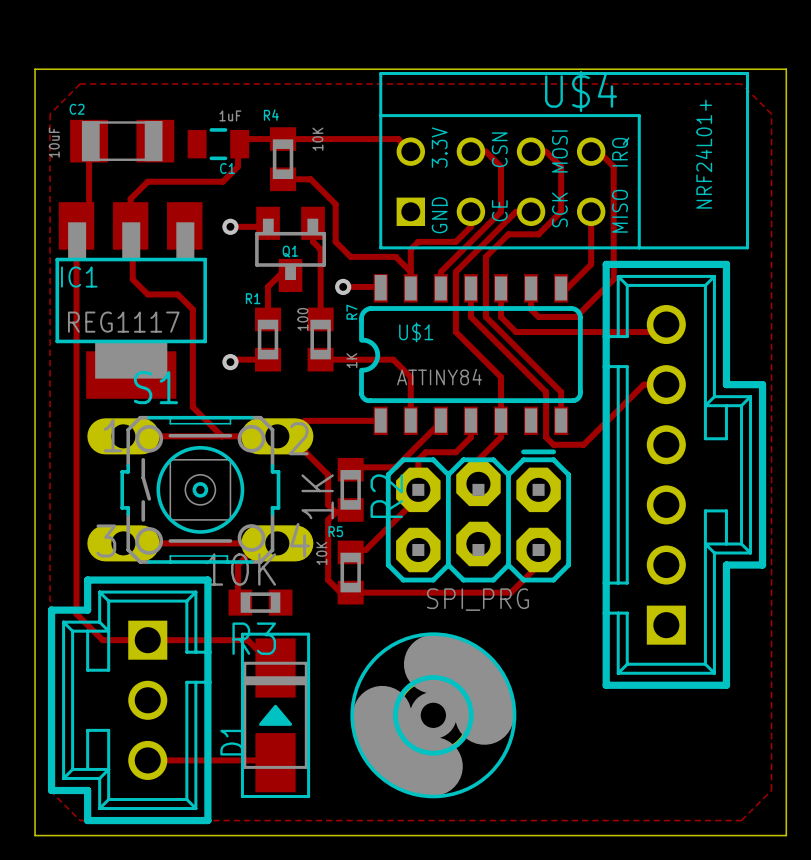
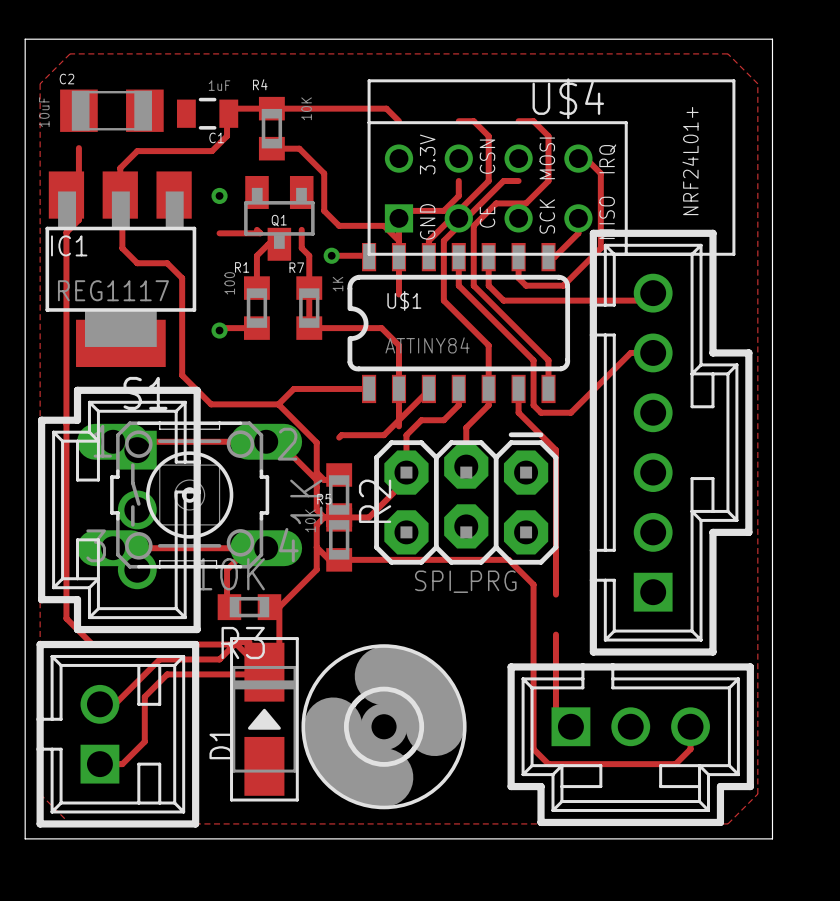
board edge: (35, 69) (786, 69) -> (25, 76) (25, 39) (772, 39) (772, 76)
zone outline: (50, 114) (80, 84) (741, 84) (771, 114) -> (40, 121) (40, 83) (70, 53) (727, 53) (757, 83) (757, 121)
C2 position: (122, 141) -> (111, 110)
C1 position: (218, 144) -> (207, 113)
track: (410, 151) (398, 139) (244, 139) (237, 145) (237, 166) (222, 181) (147, 181) (130, 198) (130, 225) (132, 228) -> (398, 121) (386, 108) (233, 108) (227, 115) (227, 136) (212, 151) (137, 151) (120, 168) (122, 234)
track: (470, 151) (485, 151) (501, 166) (501, 211) (440, 271) (440, 288) -> (458, 121) (473, 121) (488, 136) (488, 181) (428, 240) (428, 257)
track: (531, 151) (546, 151) (561, 166) -> (518, 121) (533, 121) (548, 136) (548, 173)
R4 position: (283, 159) -> (271, 128)
track: (561, 174) (561, 211) (538, 234) (508, 234) (485, 256) -> (548, 181) (526, 203) (496, 203) (473, 225) (473, 263)
track: (283, 179) (310, 179) (335, 204) (335, 241) (350, 256) (395, 256) (410, 271) -> (271, 148) (299, 148) (324, 173) (324, 210) (339, 225) (384, 225) (398, 240)
track: (470, 211) (470, 226) (455, 241) (418, 241) (410, 249) -> (458, 181) (458, 195) (443, 210) (406, 210) (398, 218) (398, 255)
track: (531, 211) (516, 211) (455, 271) -> (518, 181) (503, 181) (443, 240) (443, 278)
via position: (230, 226) -> (219, 195)
track: (591, 226) (591, 264) -> (600, 248) (578, 270)
track: none -> (578, 233) (554, 257) (548, 257)
track: (132, 241) (132, 279) (147, 294) (177, 294) (192, 309) -> (122, 248) (137, 263) (167, 263) (182, 278) (182, 315)
track: (613, 241) (613, 279) (576, 317) (538, 317) (531, 309) (531, 288) -> none
Q1 position: (290, 249) -> (279, 218)
track: (290, 275) (279, 275) (268, 286) (268, 319) -> (279, 244) (268, 244) (256, 255) (256, 288)
track: (485, 279) (485, 317) (561, 392) (561, 420) -> (473, 285) (548, 360) (548, 388)
track: (576, 279) (567, 288) (561, 288) -> (563, 285) (526, 285) (518, 278) (518, 257)
track: (343, 286) (380, 288) -> (331, 255) (369, 257)
via position: (343, 286) -> (331, 255)
track: (470, 288) (470, 317) (546, 392) -> (458, 257) (458, 285) (533, 360) (533, 397)
track: (501, 288) (501, 317) (516, 332) (658, 332) (666, 324) -> (488, 257) (488, 285) (503, 300) (645, 300) (653, 293)
track: (455, 294) (455, 332) (501, 377) -> (443, 300) (488, 345) (488, 382)
IC1 position: (131, 300) -> (120, 269)
R7 name rotation: 0° (351, 312) -> 90° clockwise (296, 267)
R7 name position: R7 (351, 312) -> R7 (296, 267)
R1 value position: 100 (302, 319) -> 100 (229, 283)
R1 position: (268, 339) -> (256, 308)
R7 position: (320, 339) -> (309, 308)
U$1 position: (470, 354) -> (458, 323)
track: (268, 359) (232, 359) (230, 362) -> (256, 328) (221, 328) (219, 330)
track: (320, 359) (393, 359) (410, 377) -> (309, 328) (381, 328) (398, 345) (398, 382)
R7 value position: 1K (351, 360) -> 1K (337, 284)
via position: (230, 362) -> (219, 330)
track: (192, 369) (192, 407) (222, 436) -> (182, 375) (211, 404) (278, 404)
track: none -> (518, 388) (518, 412) (555, 450) (555, 594)
track: (666, 384) (643, 384) (583, 444) (553, 444) (546, 437) (546, 399) -> (653, 352) (630, 352) (570, 412) (541, 412) (533, 405)
track: none -> (278, 404) (316, 442) (316, 472) (324, 480) (336, 480) (339, 477)
track: (501, 399) (501, 437) (478, 459) -> (488, 405) (466, 427) (466, 465)
track: (380, 420) (305, 420) (289, 436) -> (369, 388) (293, 388) (278, 404)
track: (440, 420) (395, 467) (353, 467) (350, 469) -> (428, 388) (384, 435) (341, 435) (339, 437)
track: (470, 420) (470, 437) (455, 452) (425, 452) (418, 459) -> (458, 388) (458, 405) (443, 420) (421, 420) (406, 435) (406, 465)
track: (418, 474) (418, 497) (365, 549) (353, 549) (350, 552) -> (406, 480) (369, 517) (341, 517) (339, 519)
part position: (684, 474) -> (671, 442)
part position: (478, 515) -> (466, 498)
track: none -> (316, 547) (329, 559) (508, 559) (533, 584) (533, 749) (548, 764) (675, 764) (690, 749) (690, 726)
track: (538, 549) (538, 565) (510, 592) (340, 592) (328, 580) (328, 565) -> (99, 764) (122, 764) (144, 741) (144, 696) (167, 674) (264, 674) (279, 659) (279, 607) (316, 569)
R5 position: (350, 572) -> (339, 539)
track: none -> (555, 634) (555, 719) (563, 726) (570, 726)
track: none -> (249, 642) (236, 642) (219, 659) (159, 659) (114, 704) (99, 704)
part position: (129, 700) -> (119, 509)
part position: (433, 715) -> (384, 726)
part: none -> (117, 734)
part: none -> (630, 744)
track: (147, 760) (273, 760) (275, 762) -> none

